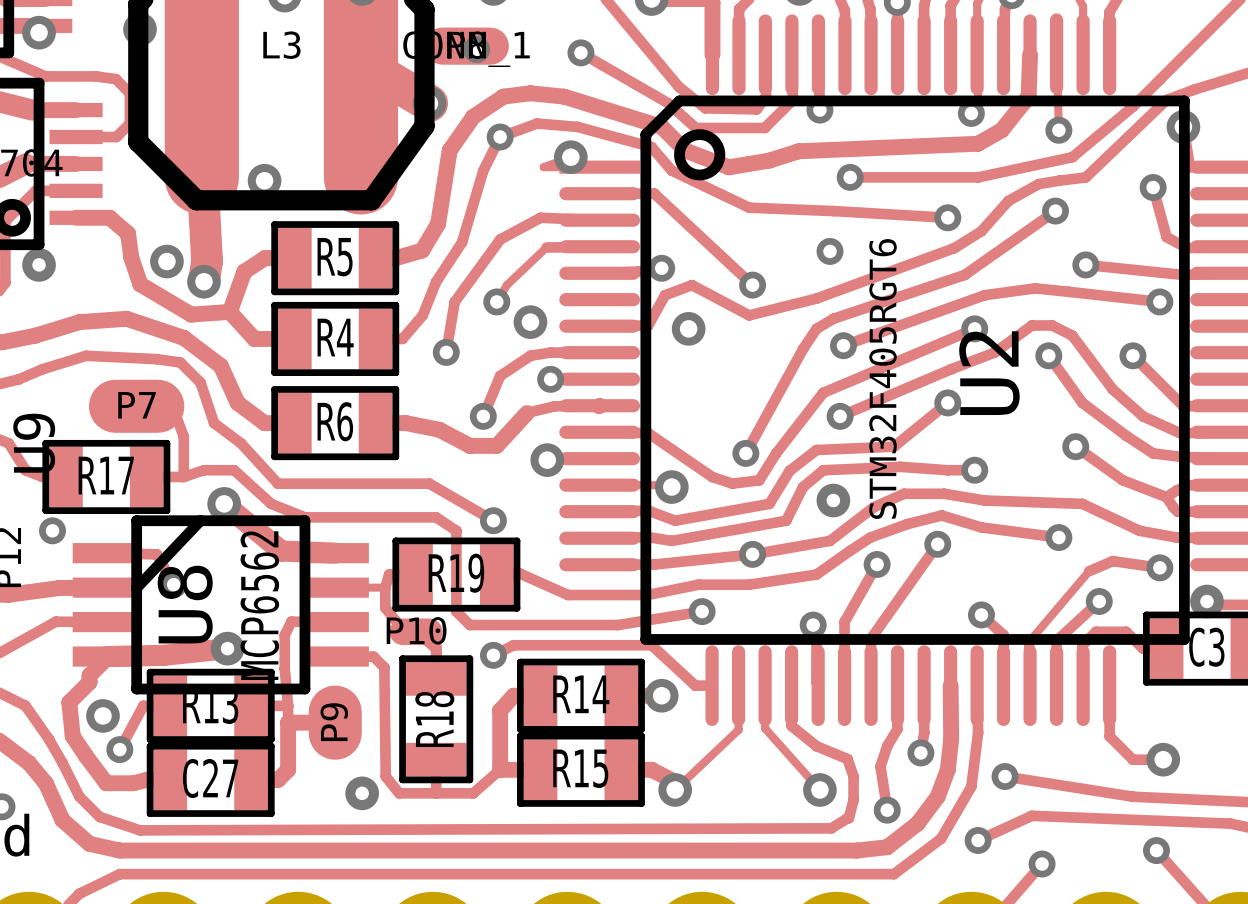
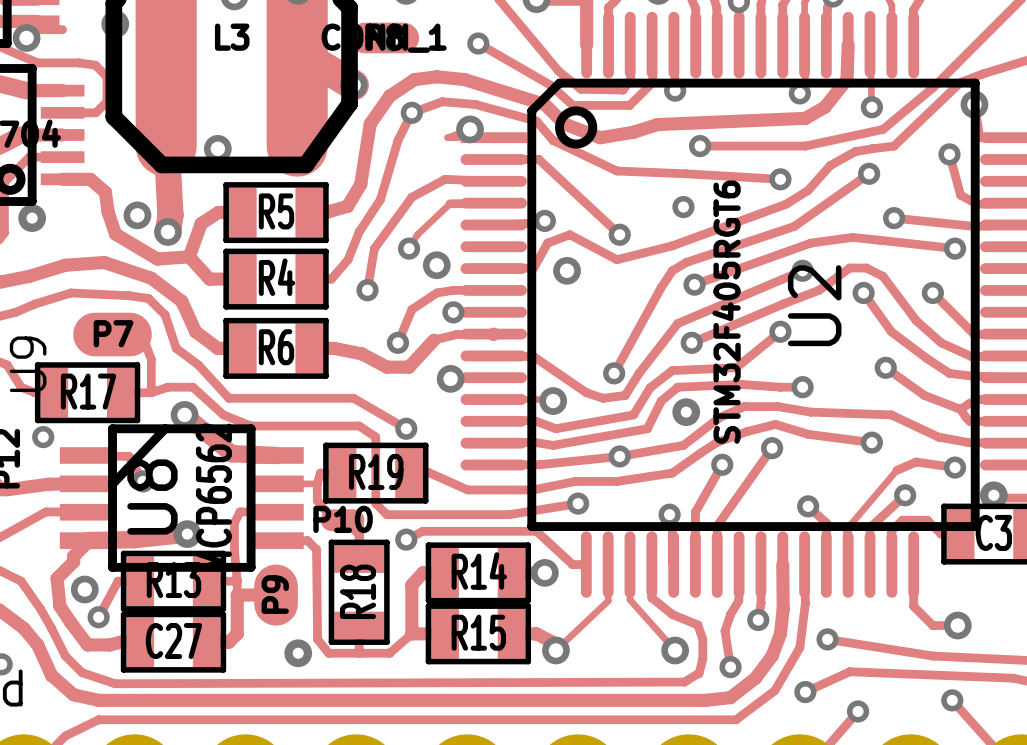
via position: (39, 32) -> (26, 37)
track: none -> (62, 29) (32, 29) (26, 37)

